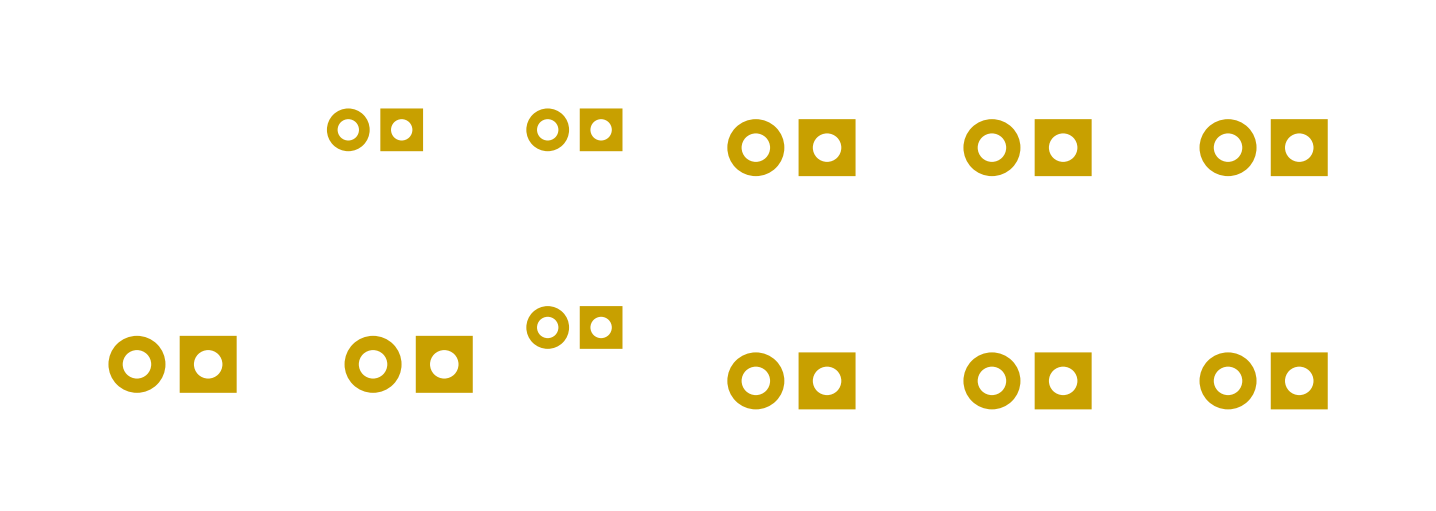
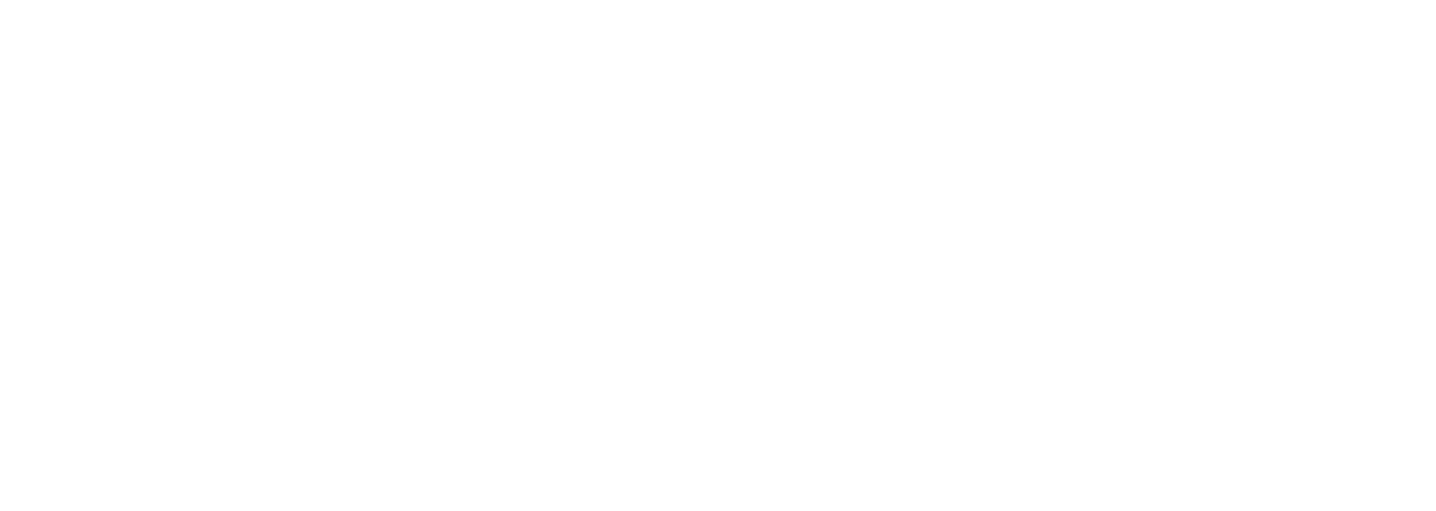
part: (375, 129) -> none
part: (574, 129) -> none
part: (791, 147) -> none
part: (1027, 147) -> none
part: (1263, 147) -> none
part: (574, 327) -> none
part: (172, 364) -> none
part: (408, 364) -> none
part: (791, 380) -> none
part: (1027, 380) -> none
part: (1263, 380) -> none

